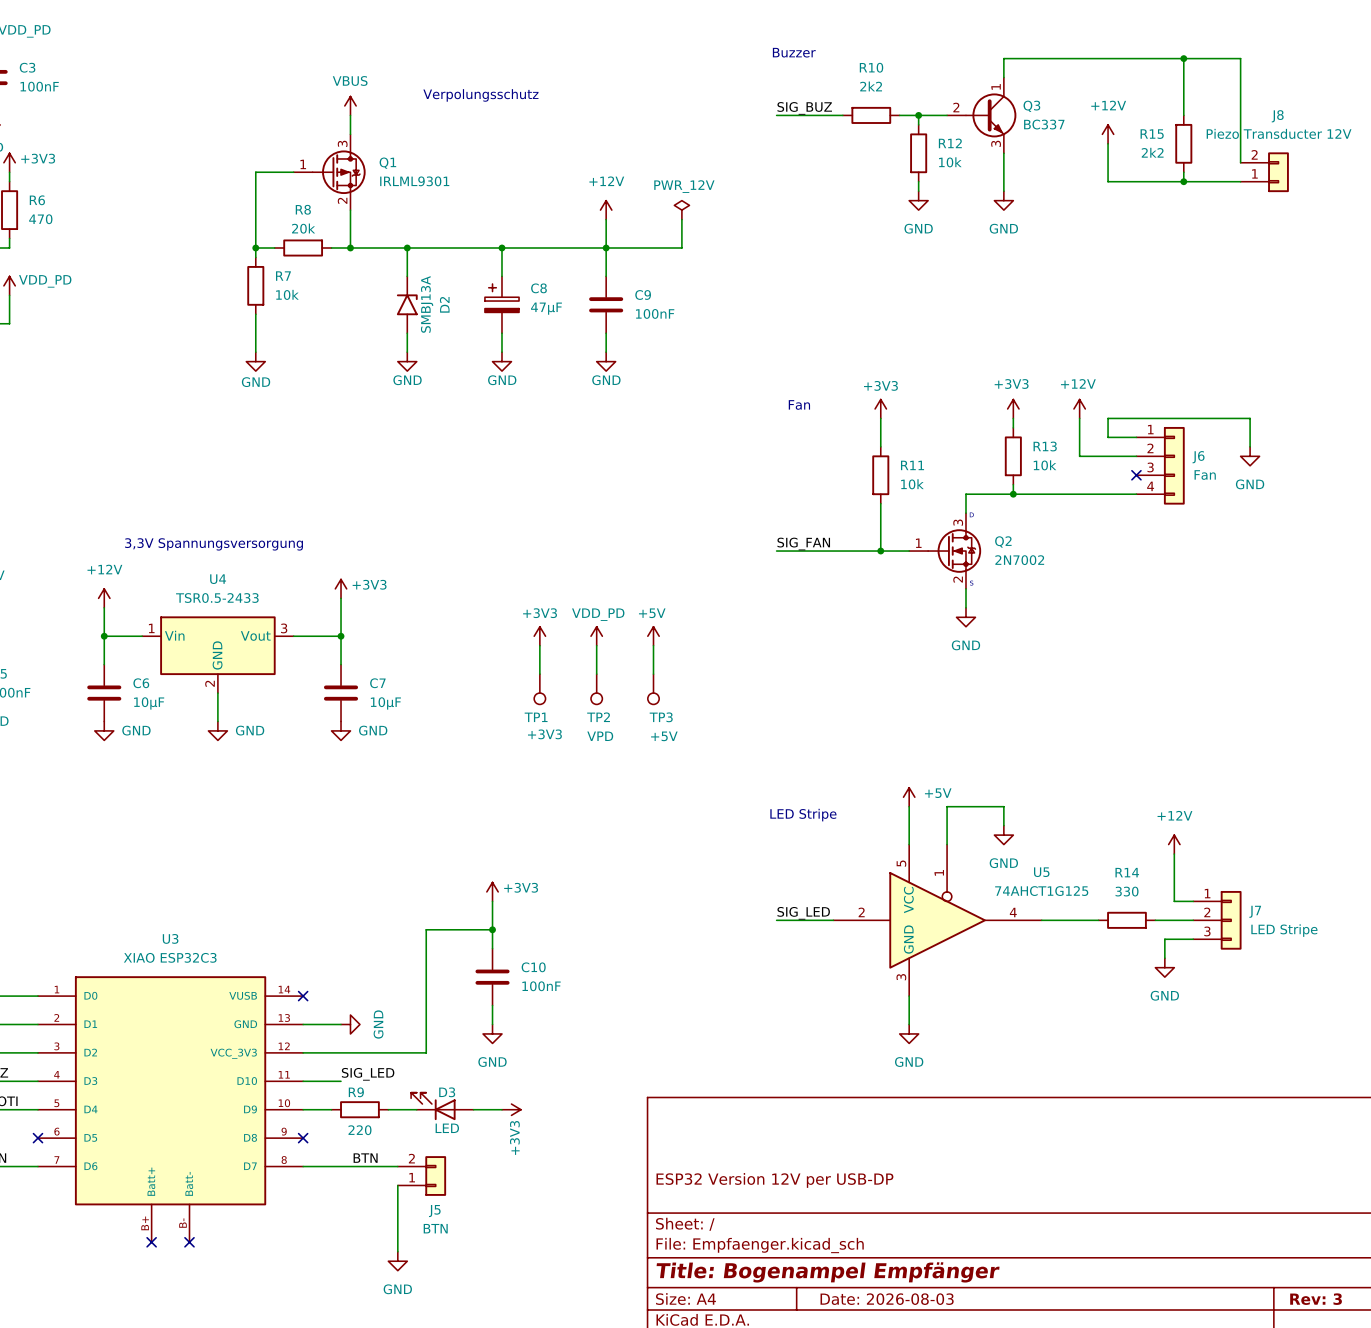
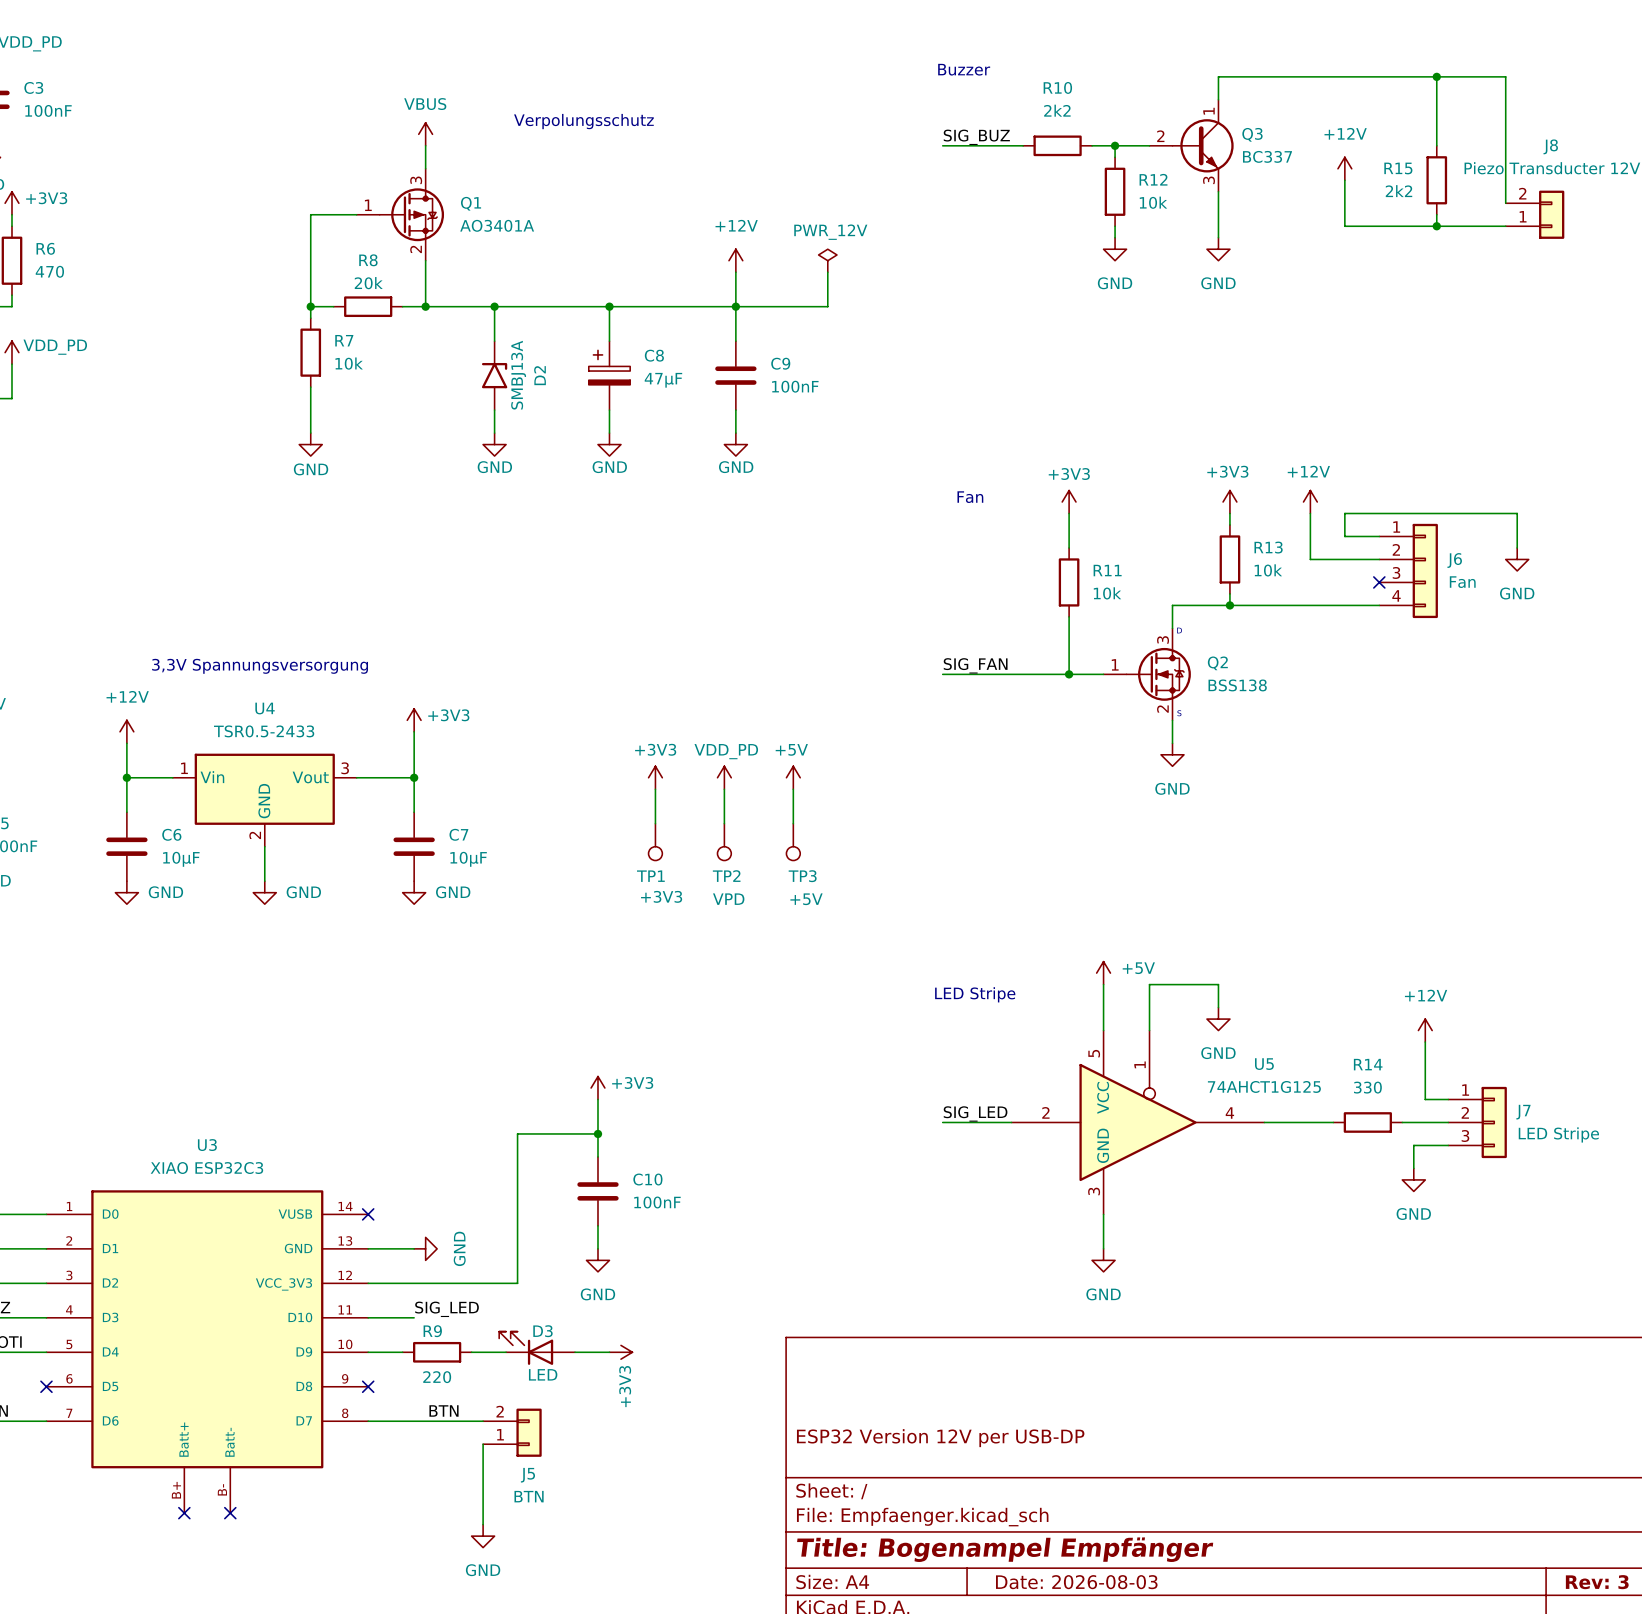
Q1 value: IRLML9301 (414, 181) -> AO3401A (497, 225)
Q2 value: 2N7002 (1019, 560) -> BSS138 (1237, 685)

